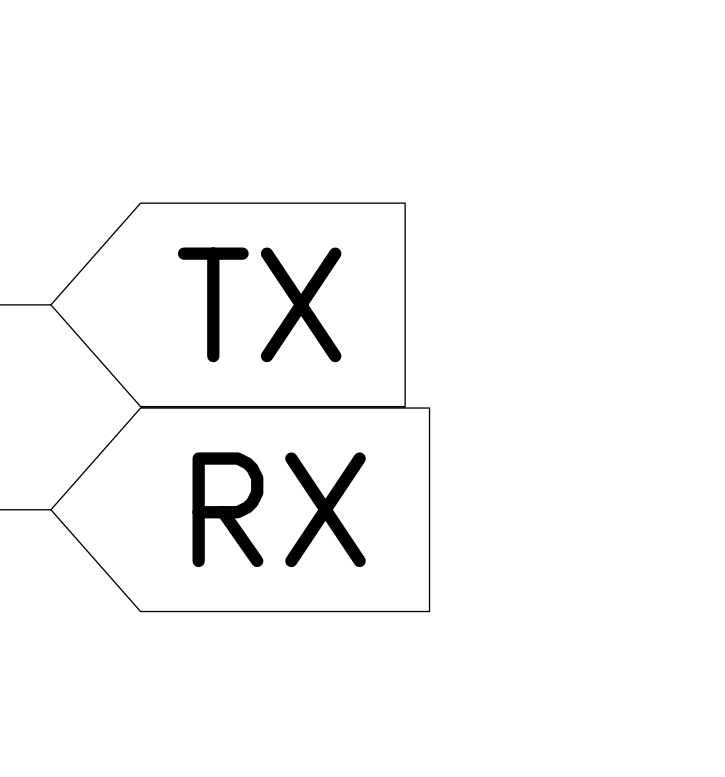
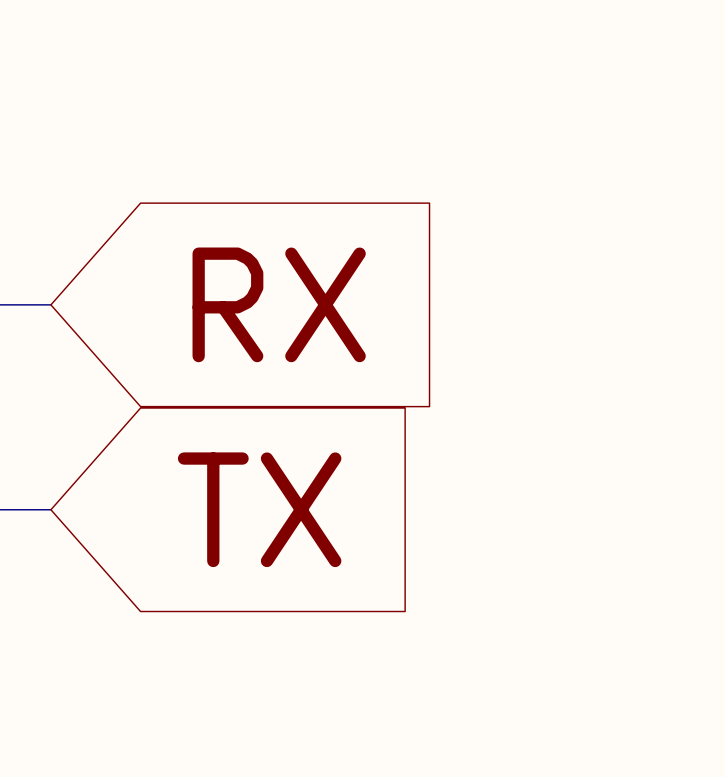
global label: TX (259, 304) -> RX (279, 304)
global label: RX (279, 509) -> TX (259, 509)

